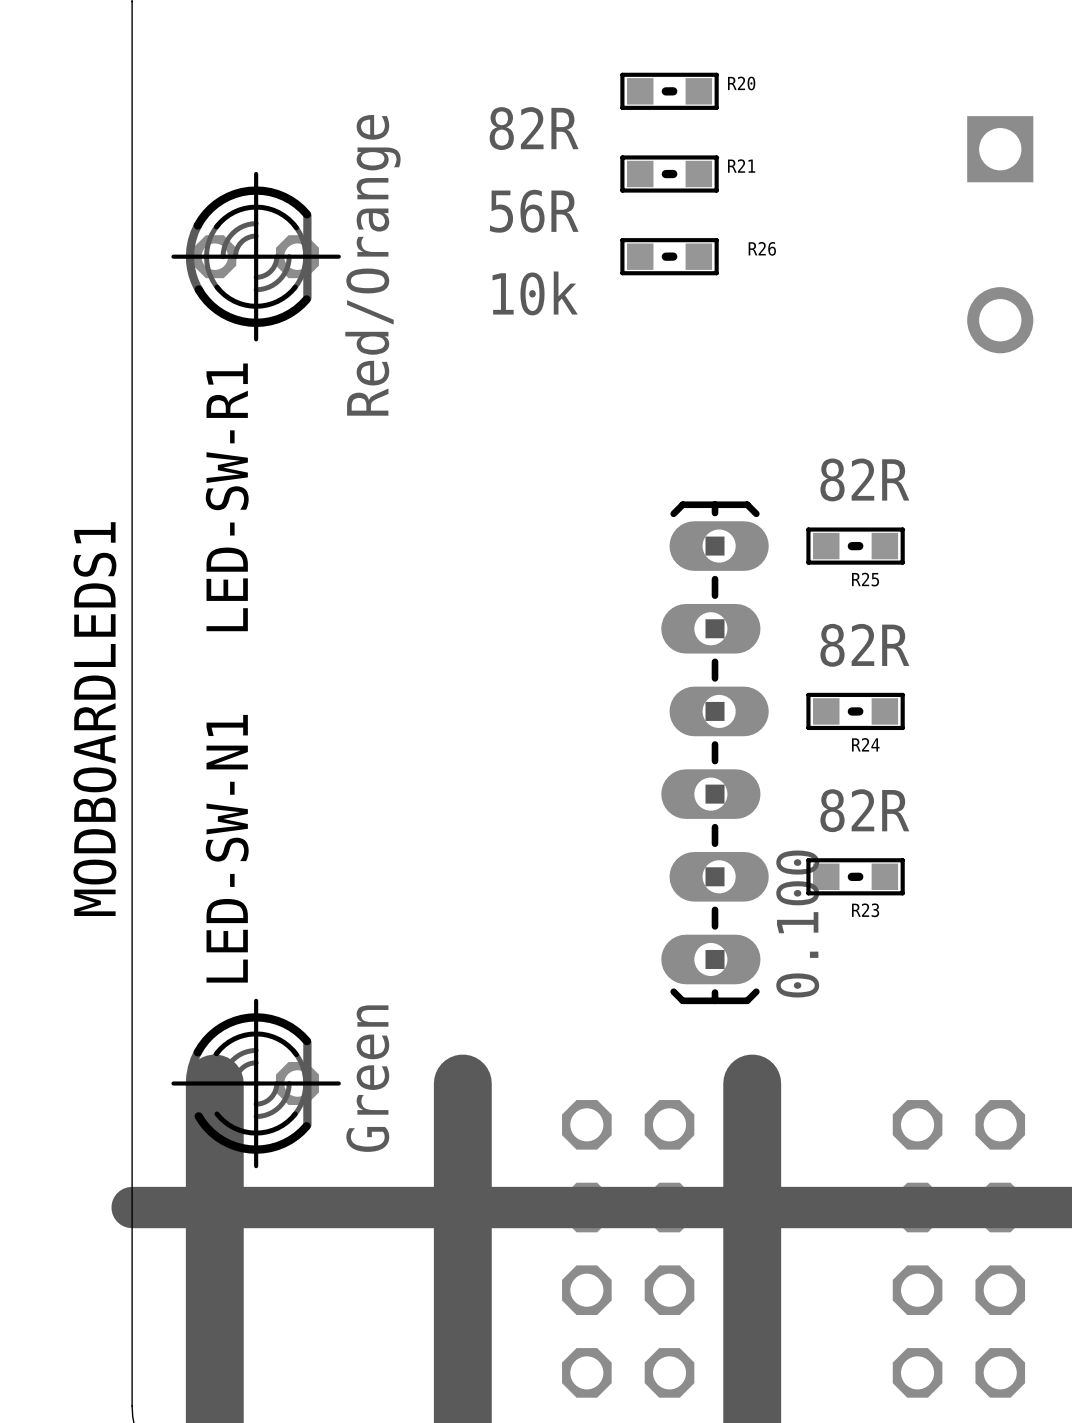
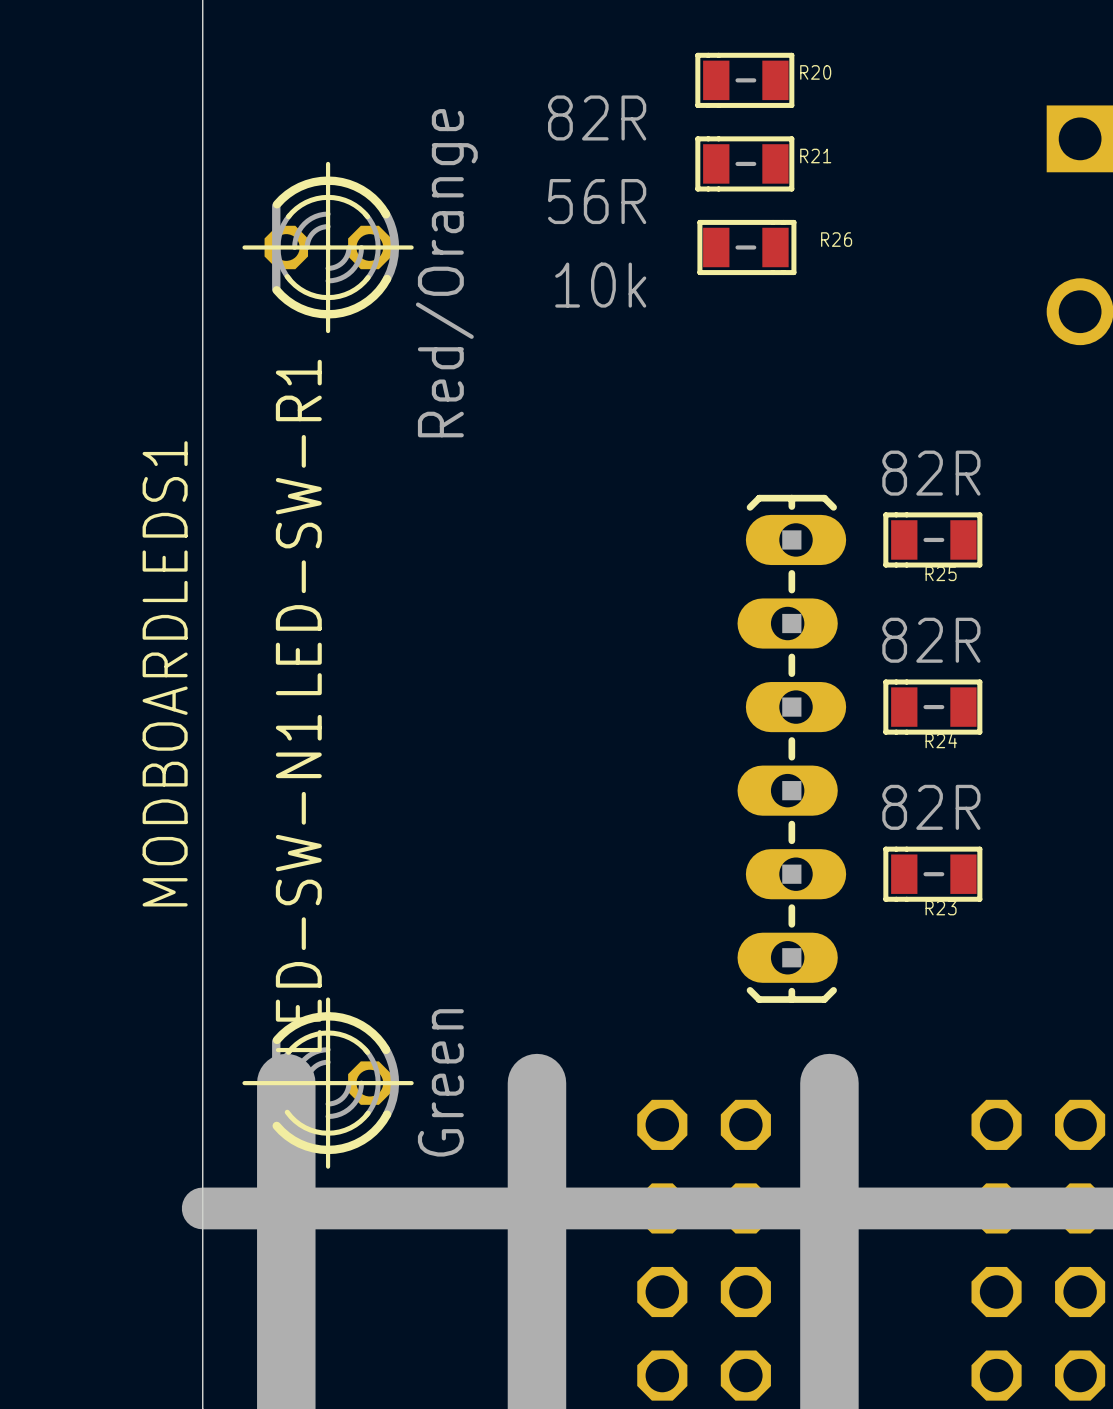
R20 footprint: [620, 72, 719, 110] -> [695, 52, 795, 108]
R21 footprint: [620, 155, 719, 193] -> [695, 136, 795, 192]
R26 footprint: [620, 238, 719, 276] -> [697, 219, 797, 276]
LED-SW-R1 rotation: 0° (252, 256) -> 180° (331, 247)
R25 footprint: [806, 527, 905, 565] -> [883, 512, 983, 568]
R24 footprint: [806, 692, 905, 731] -> [883, 679, 983, 735]
R23 footprint: [806, 858, 905, 896] -> [883, 846, 983, 902]
MODBOARDLEDS1 value: 0.100 (797, 924) -> none
LED-SW-N1 rotation: 0° (252, 1083) -> 180° (331, 1083)

